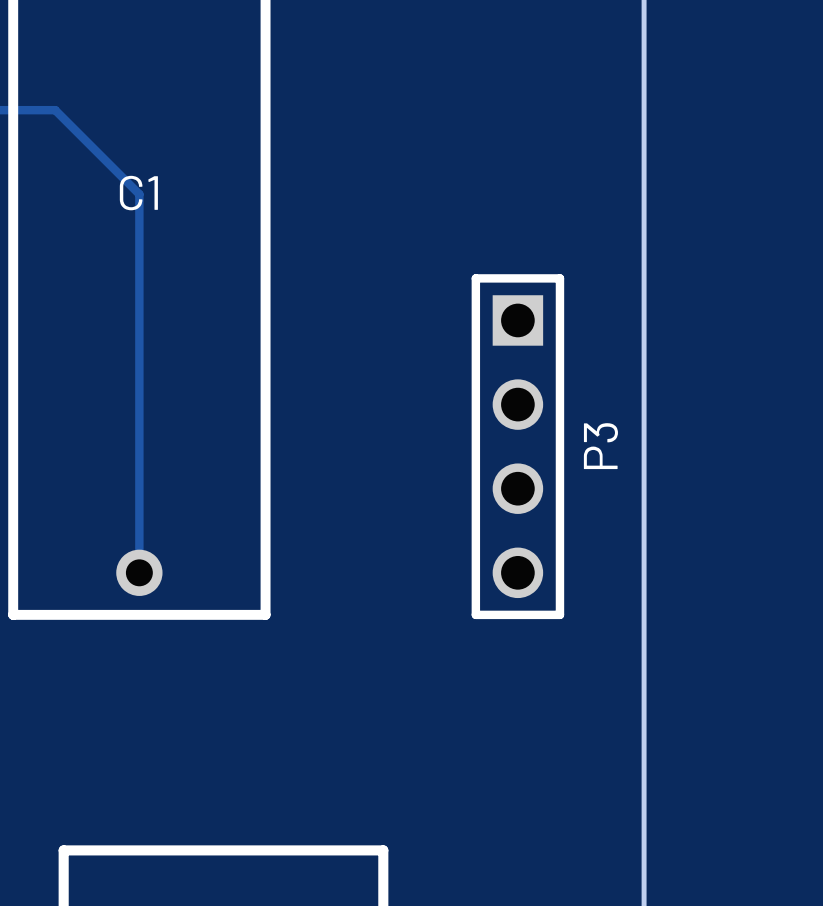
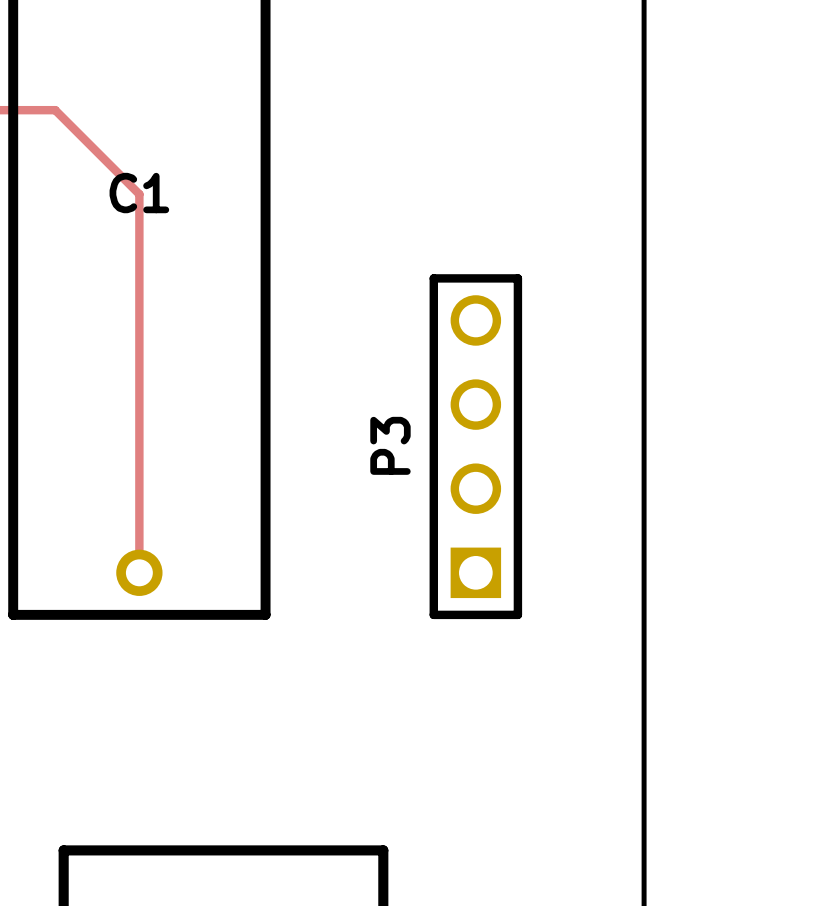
P3 rotation: 0° (517, 446) -> 180° (475, 446)

